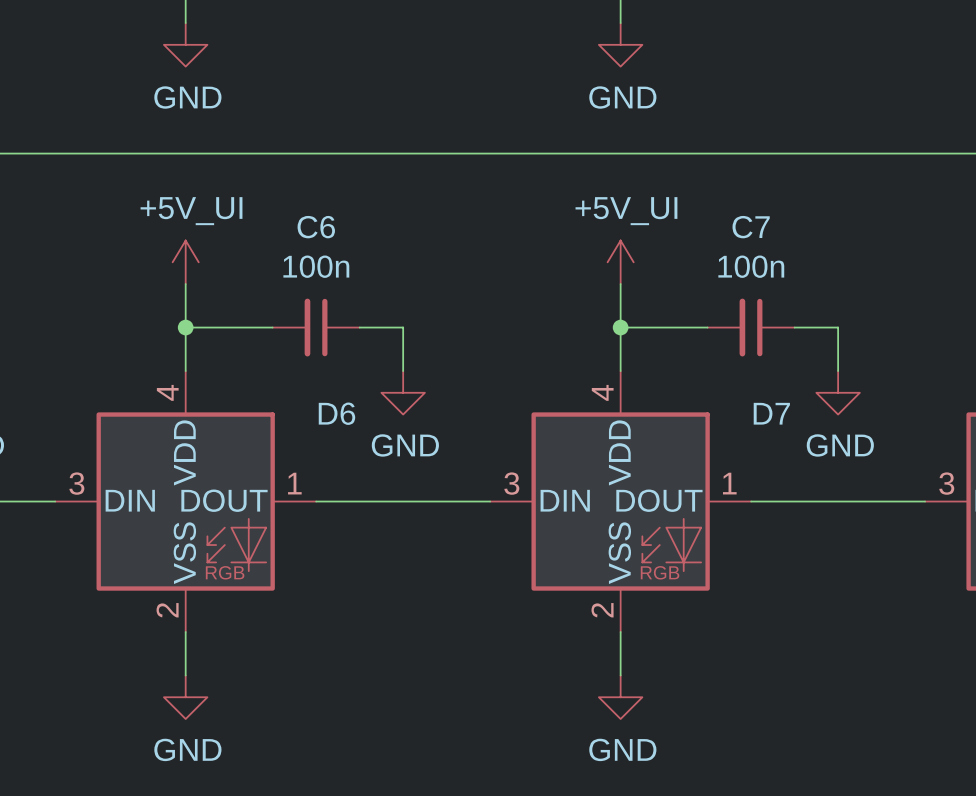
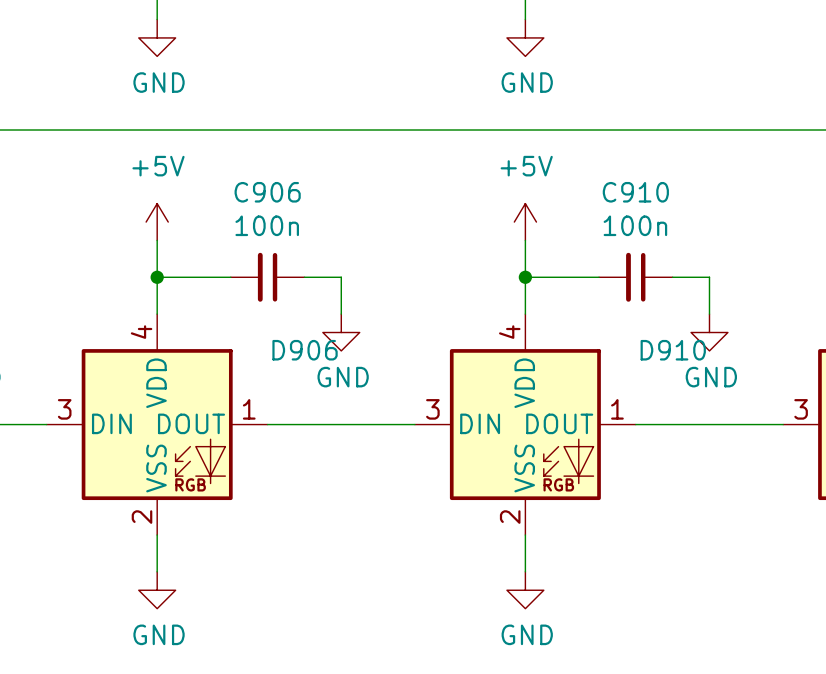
C6 name: C6 (316, 227) -> C906 (267, 192)
C7 name: C7 (751, 227) -> C910 (635, 192)
power symbol: +5V_UI (185, 262) -> +5V (157, 222)
power symbol: +5V_UI (620, 262) -> +5V (525, 222)
D6 name: D6 (336, 413) -> D906 (305, 350)
D7 name: D7 (771, 413) -> D910 (673, 350)

